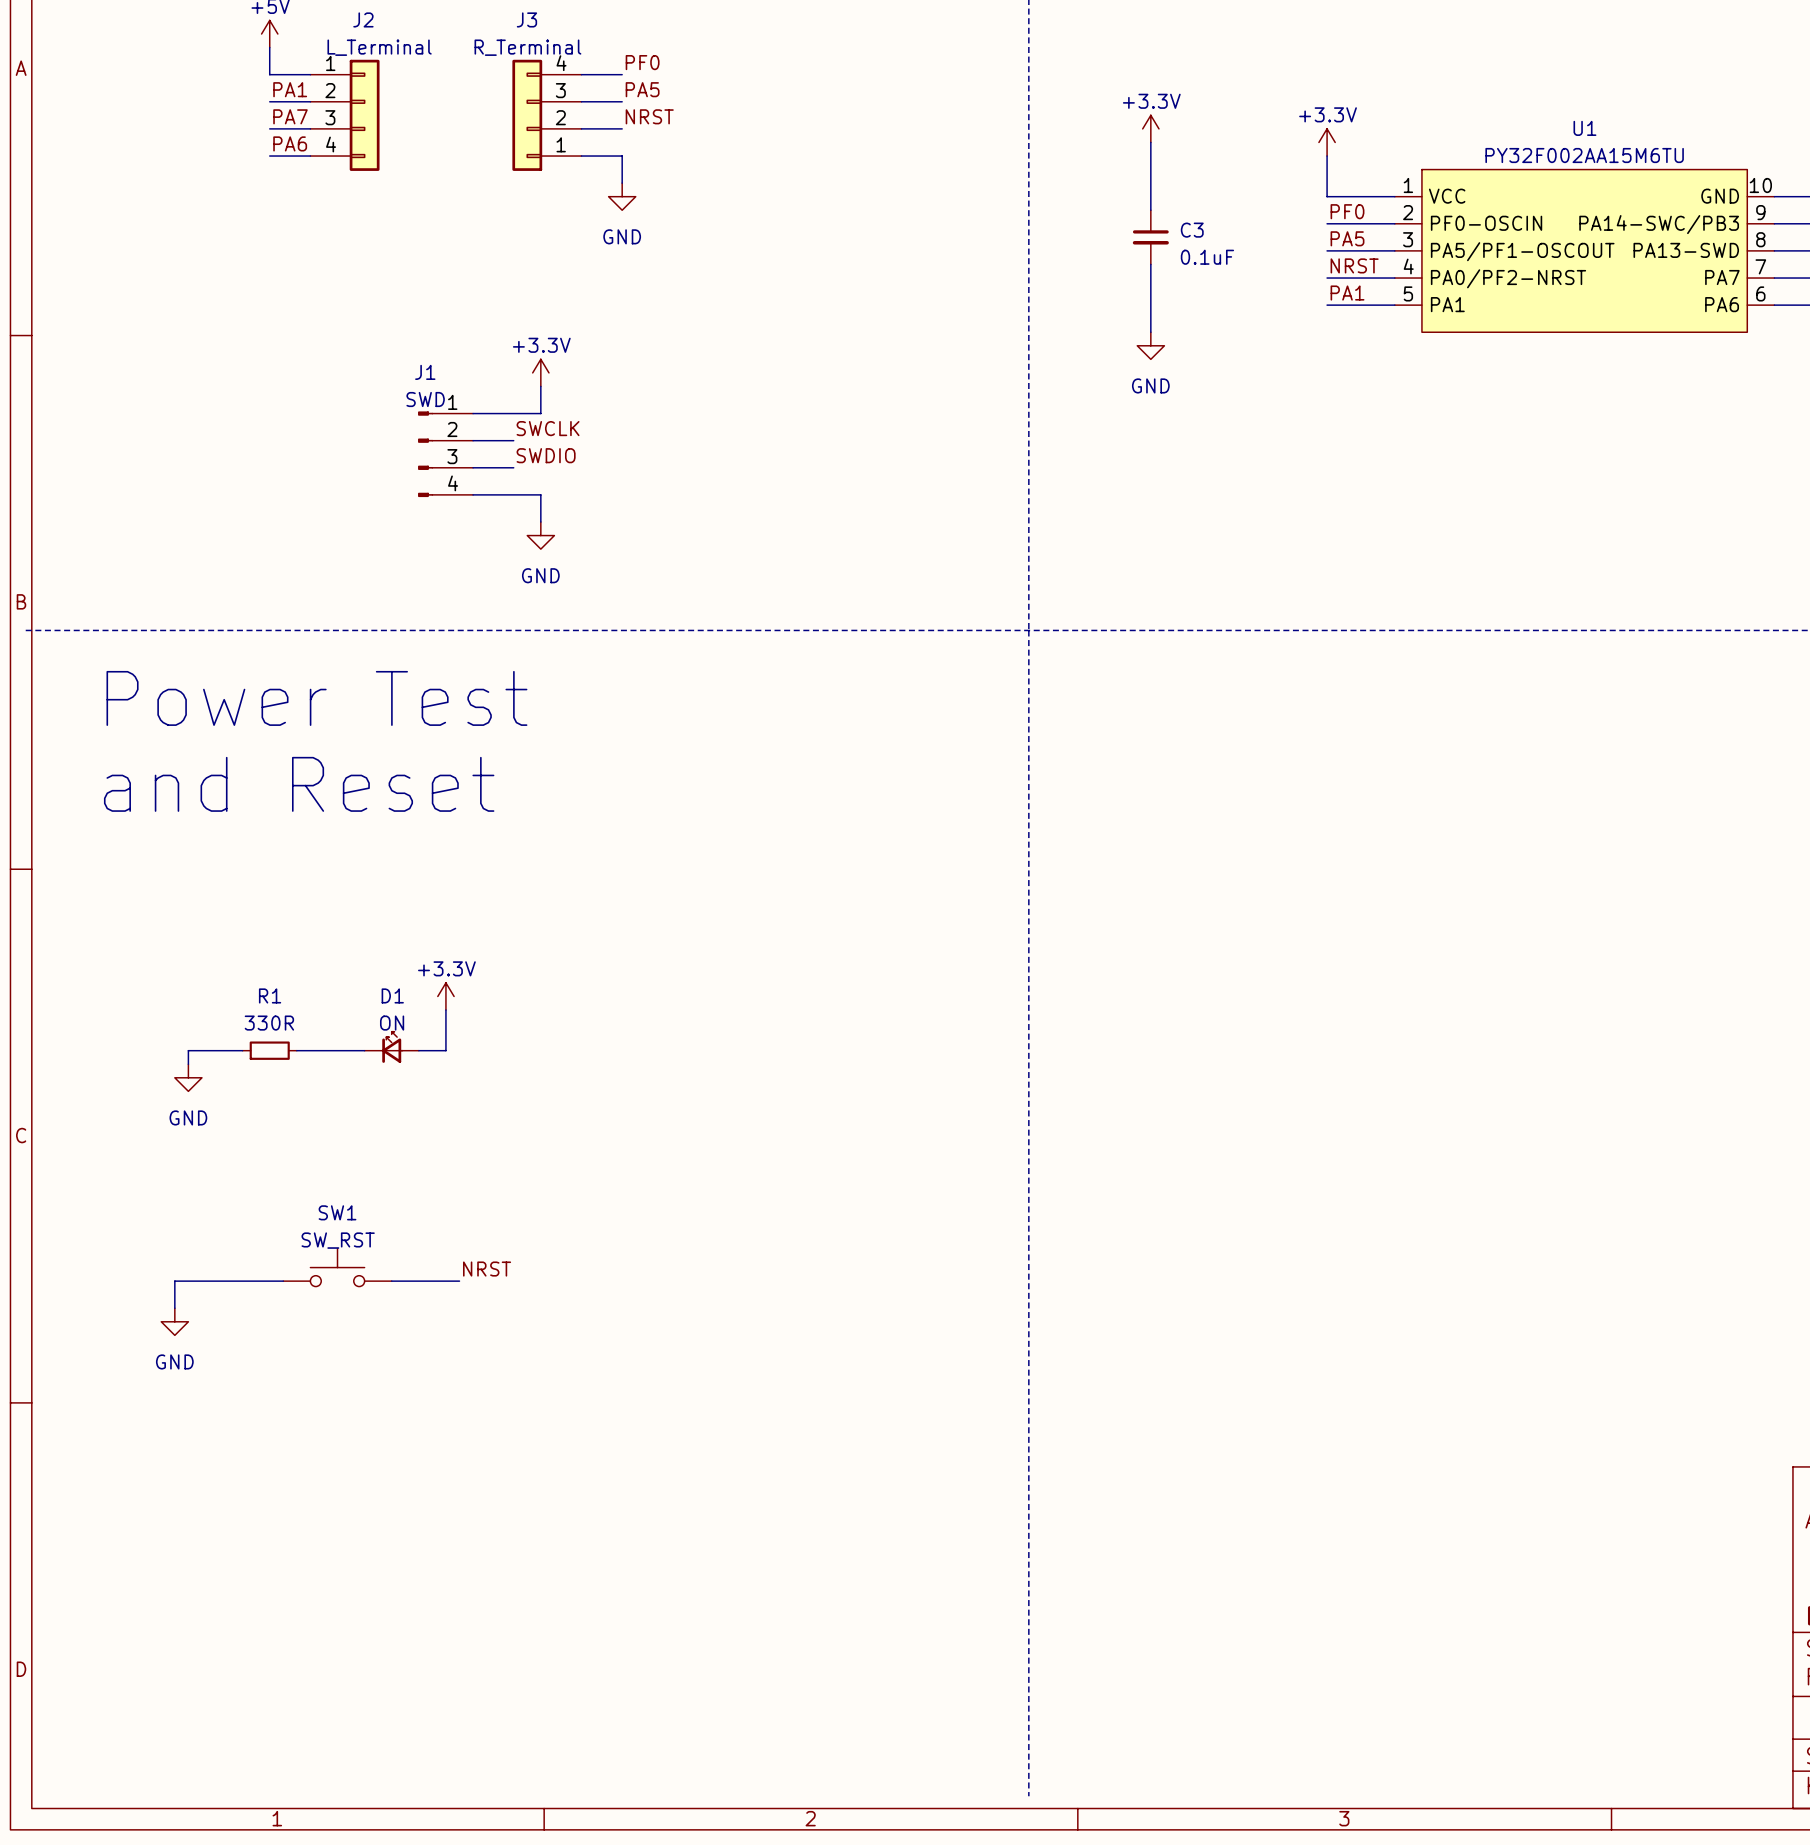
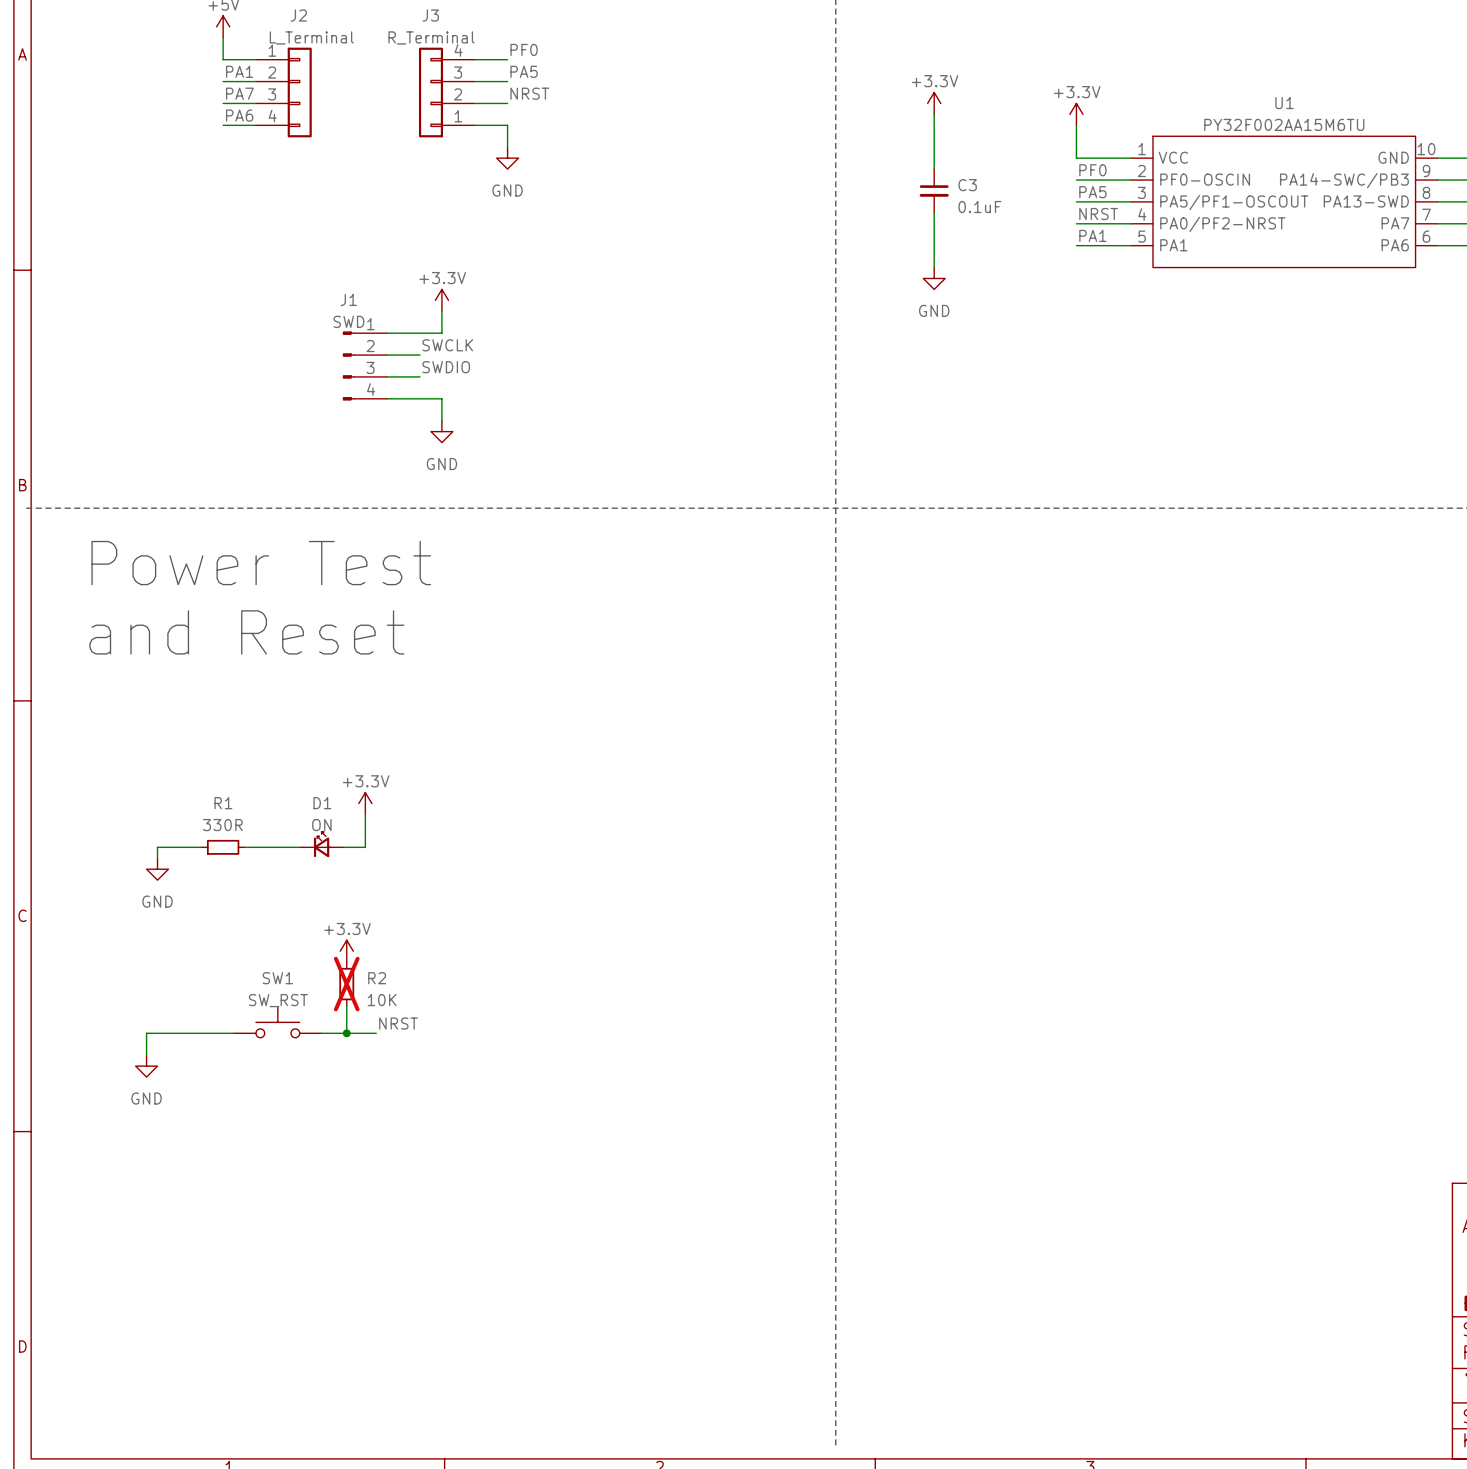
power symbol: none -> +3.3V (346, 951)
R2: none -> 10K (346, 984)
wire: none -> (346, 1005) (346, 1033)
junction: none -> (346, 1033)

